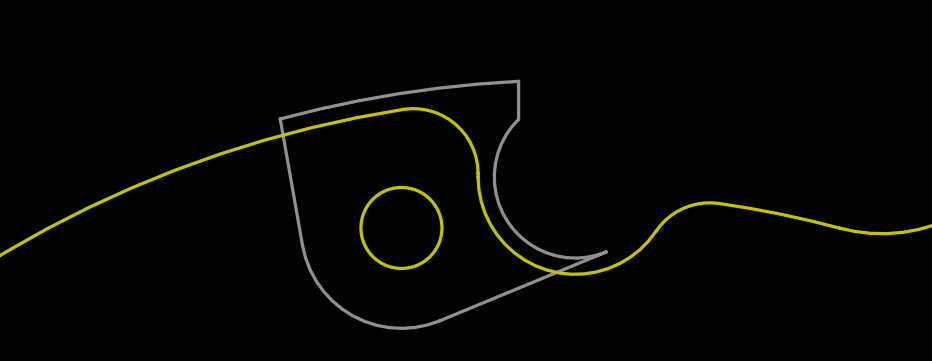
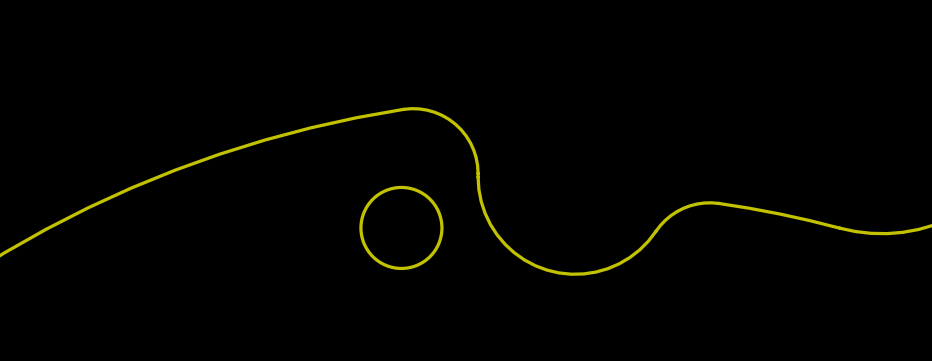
line: (518, 81) (518, 119) (506, 135) (495, 163) (496, 193) (502, 212) (520, 237) (546, 252) (576, 258) (606, 251) (427, 324) (402, 328) (376, 325) (364, 321) (342, 309) (323, 291) (310, 269) (305, 257) (280, 118) (398, 93) (518, 81) -> none

